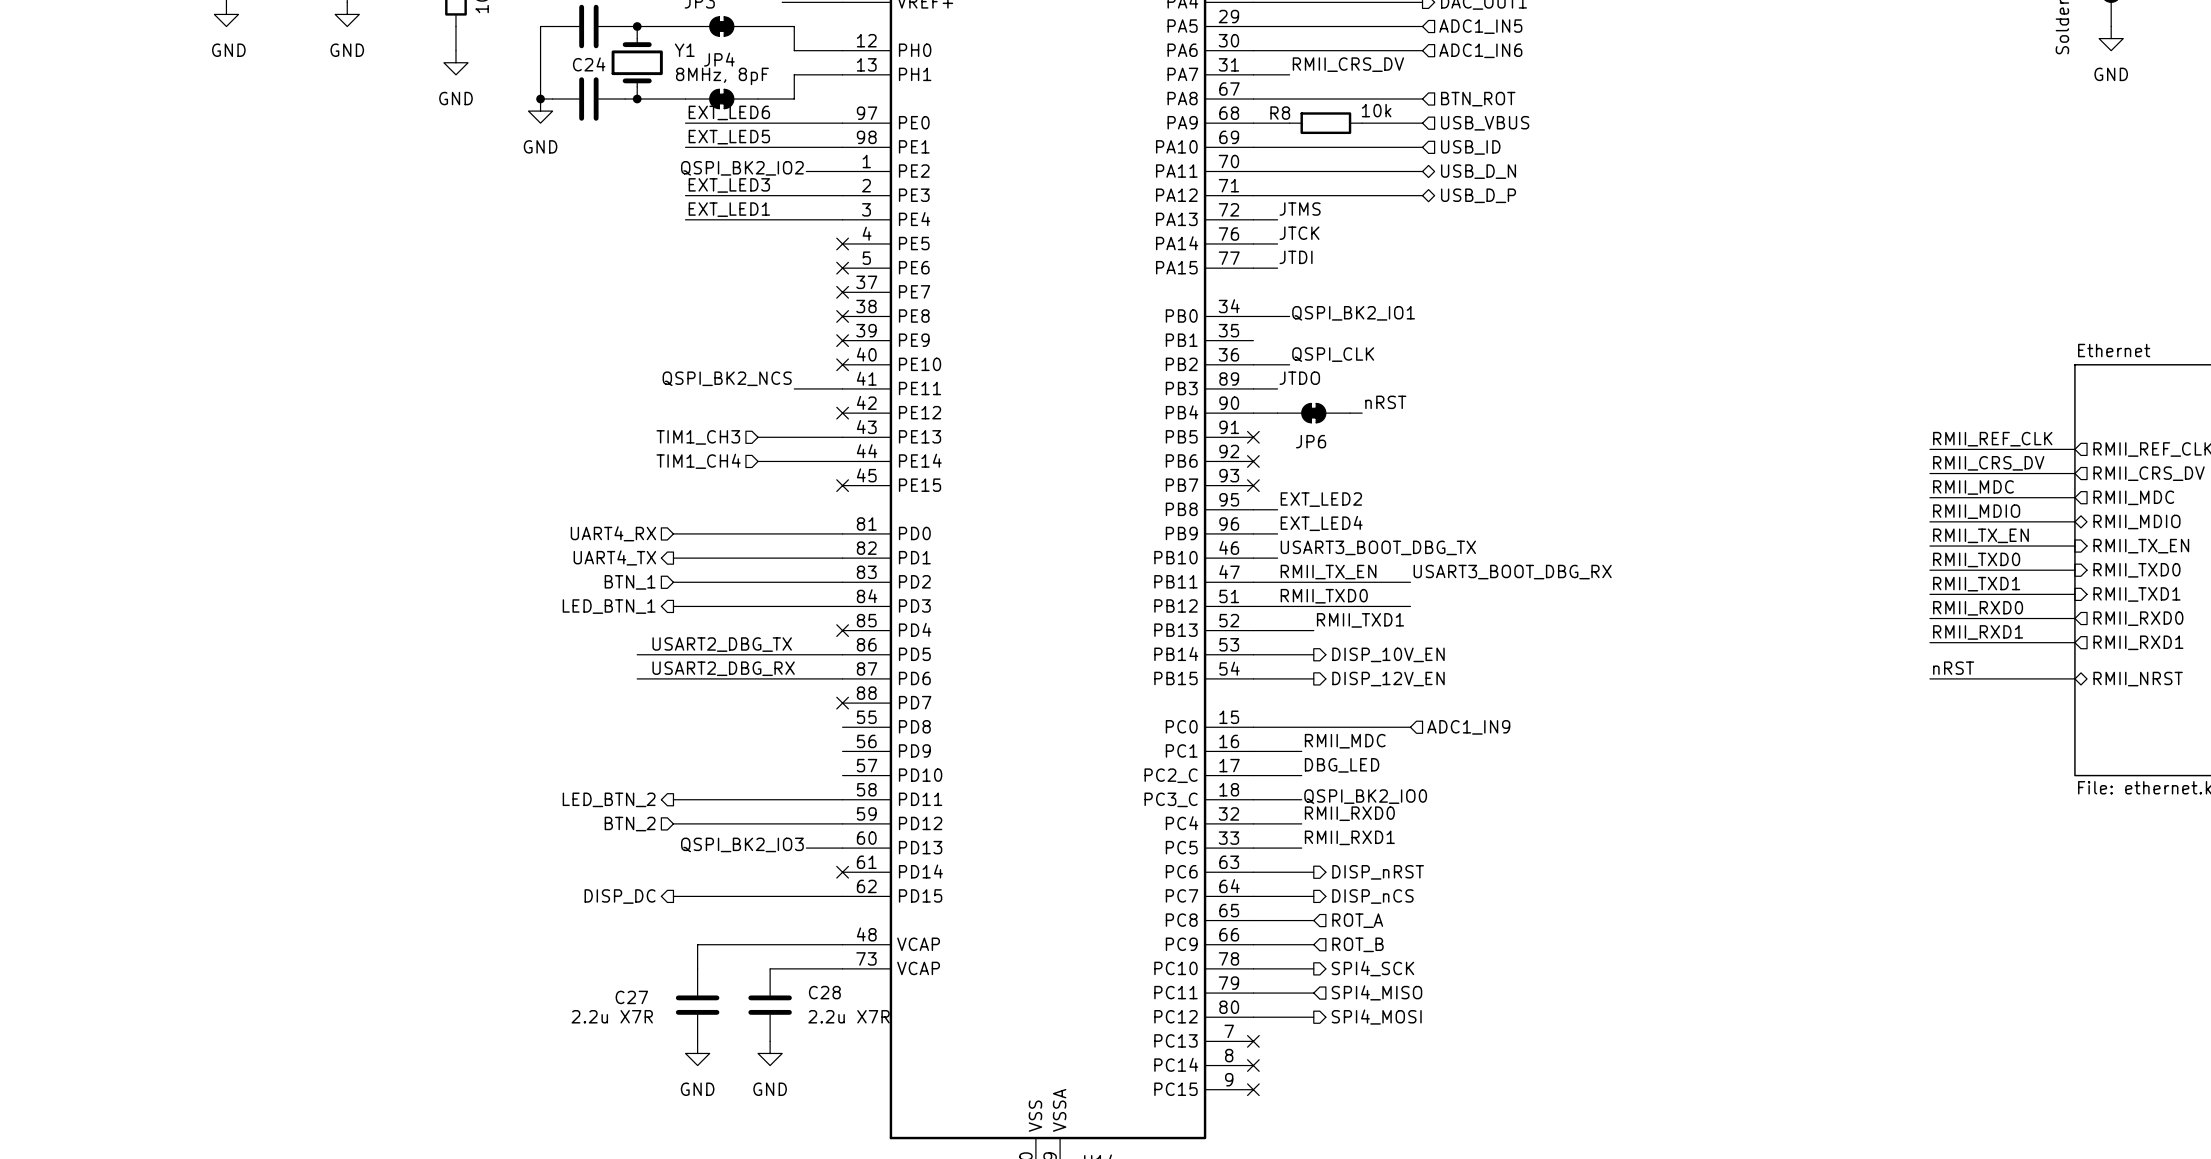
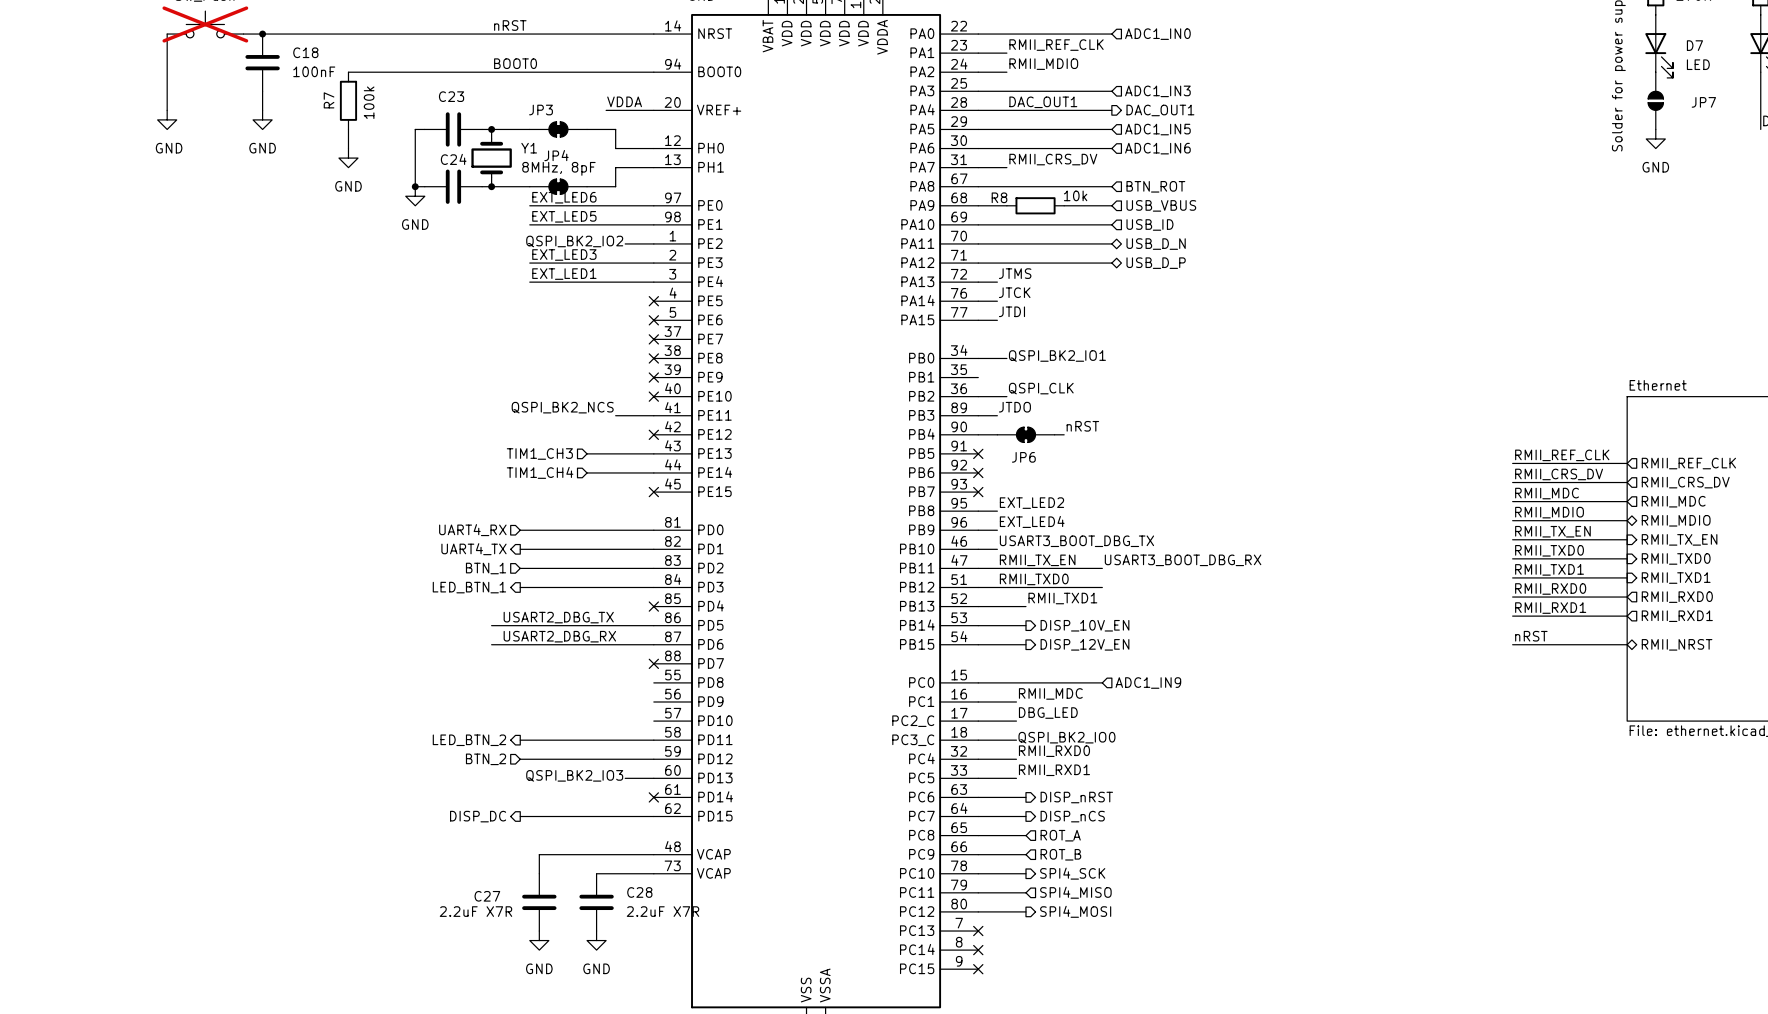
C27 value: 2.2u X7R (612, 1016) -> 2.2uF X7R (475, 911)
C28 value: 2.2u X7R (849, 1016) -> 2.2uF X7R (663, 911)

